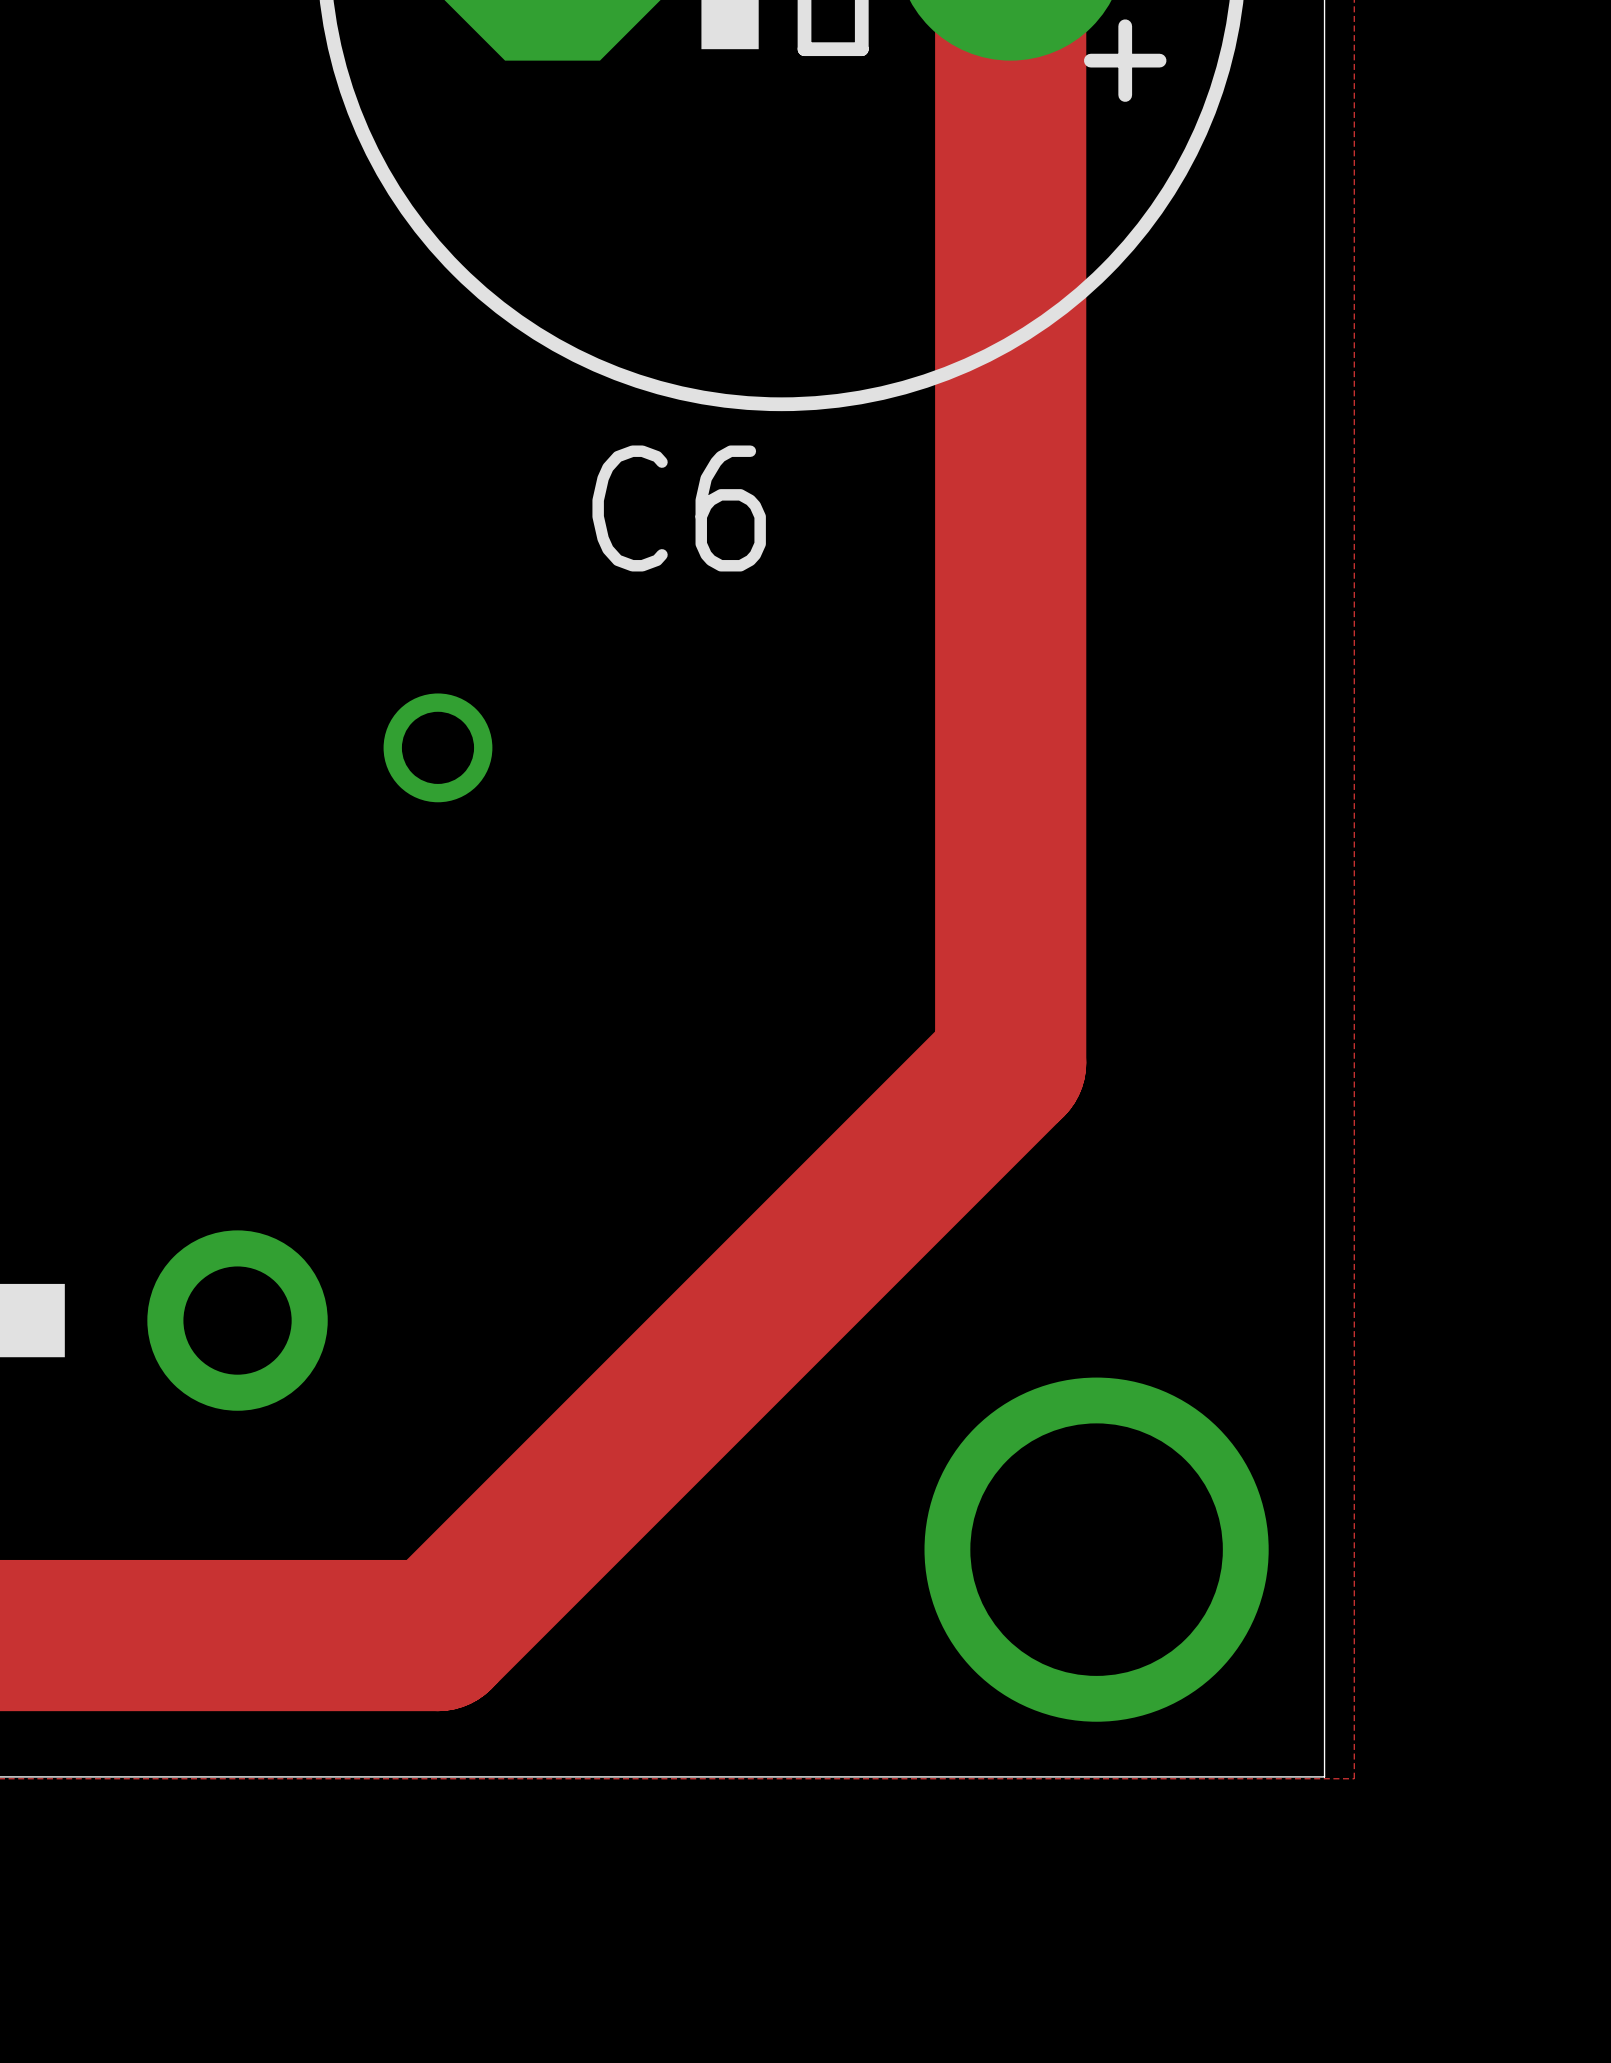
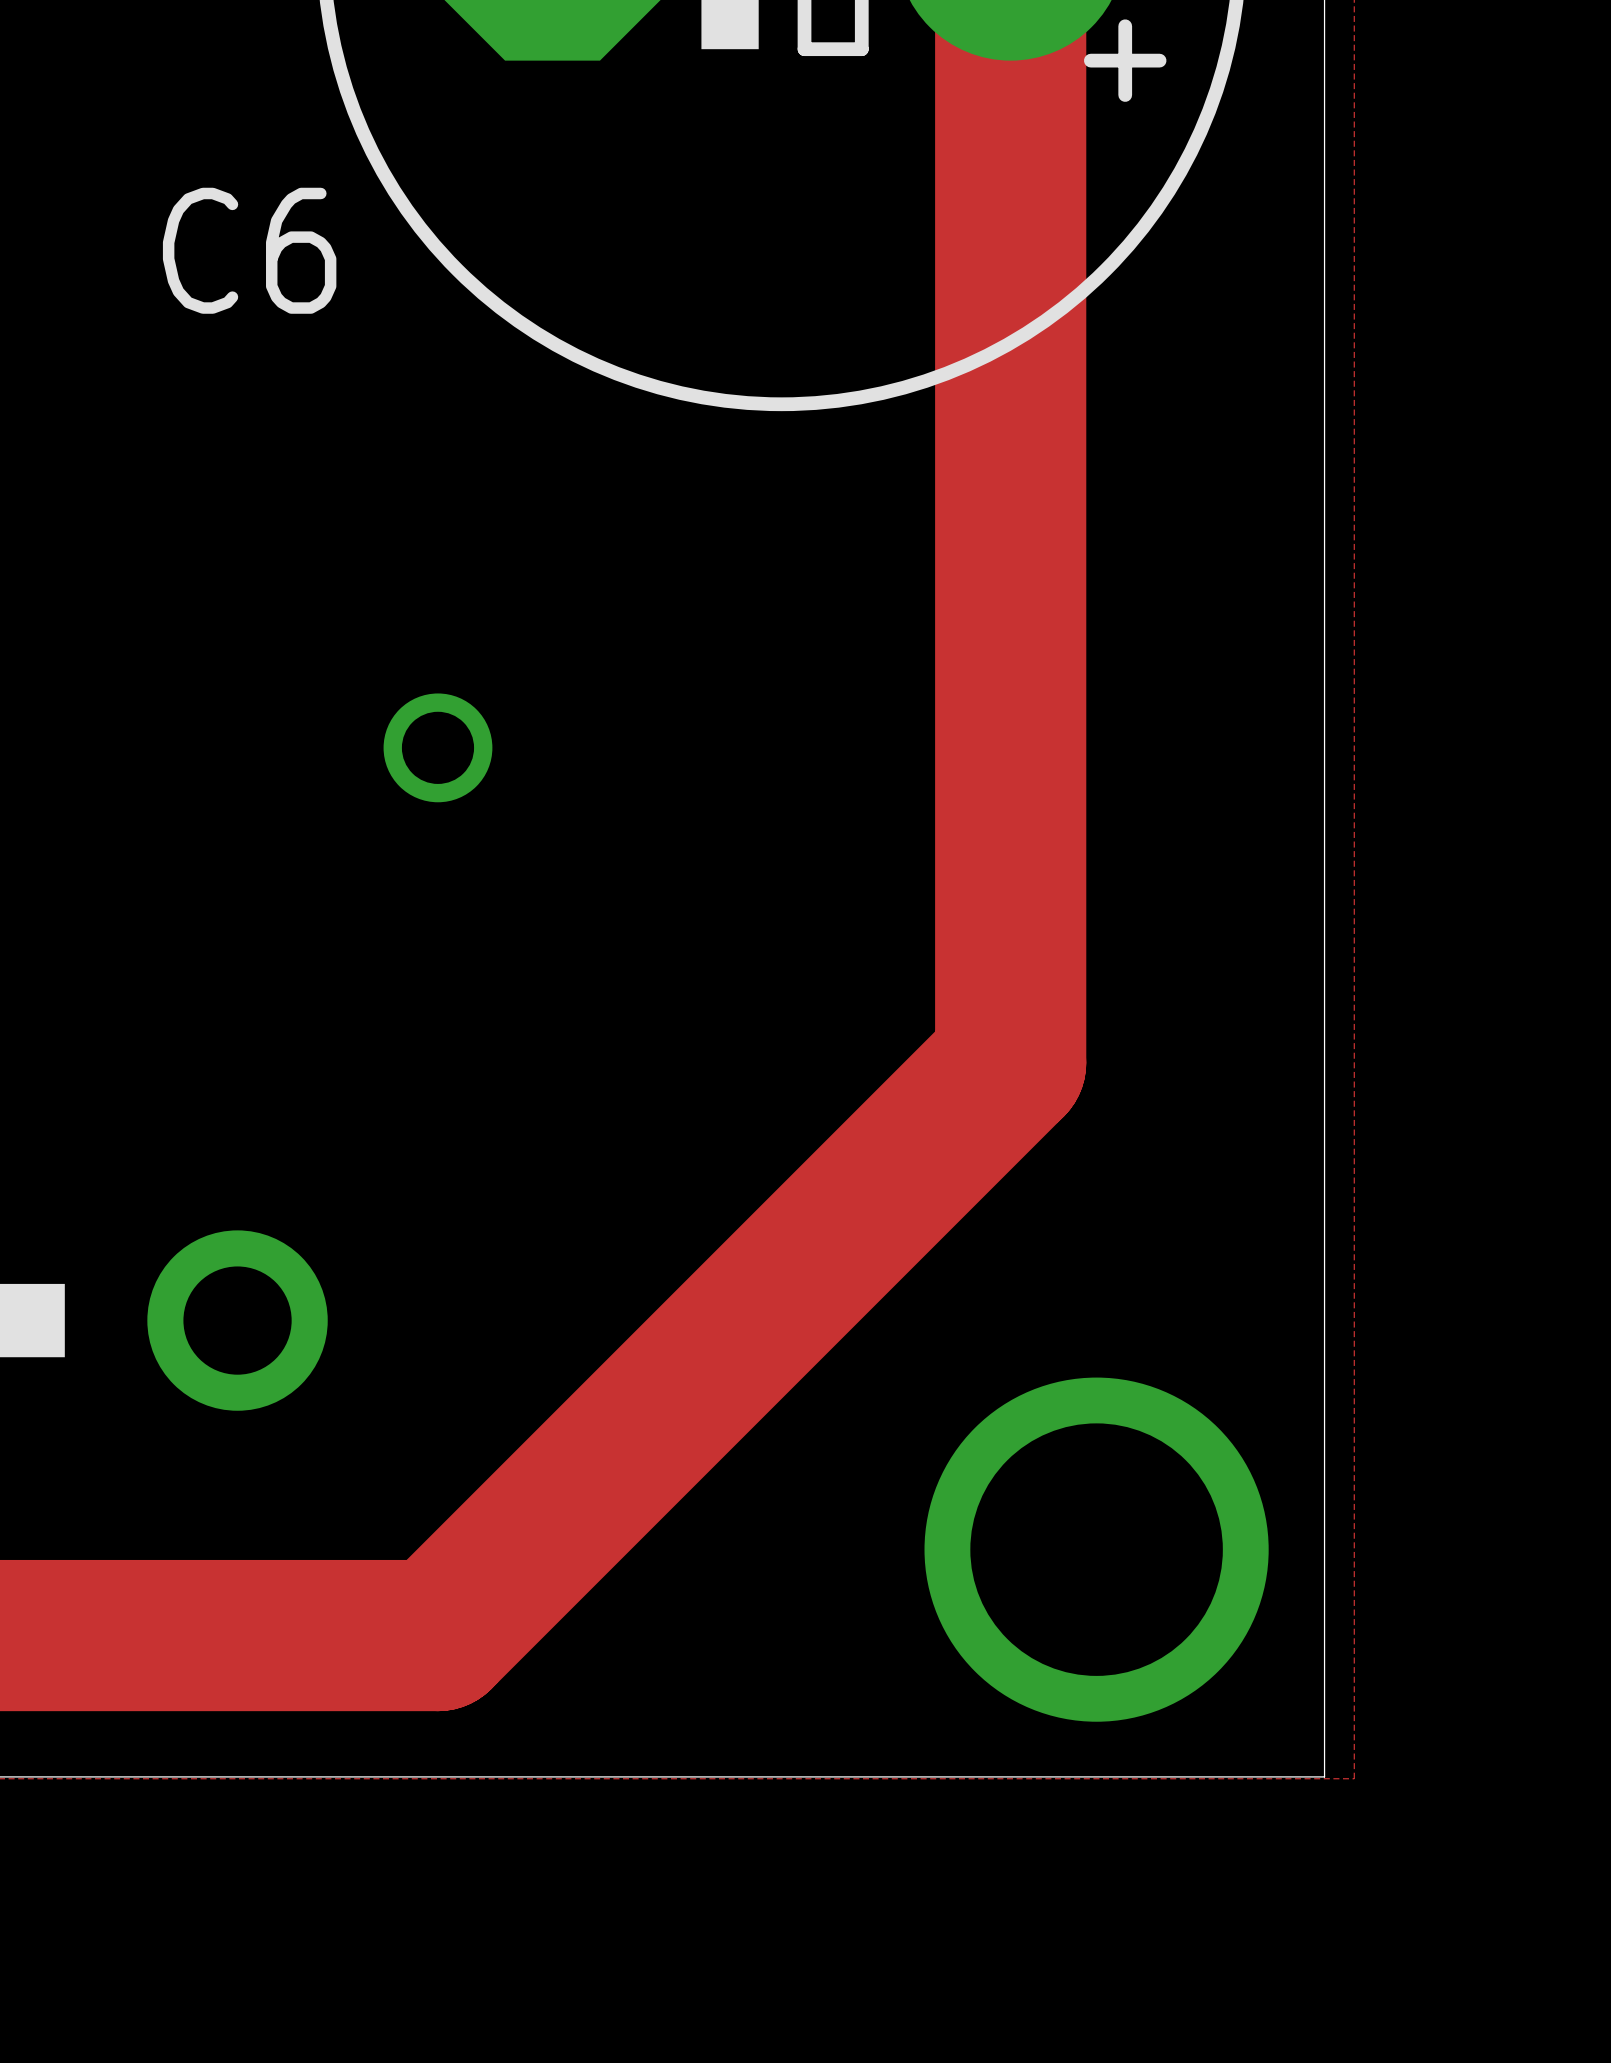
C6 name position: C6 (679, 508) -> C6 (249, 250)

